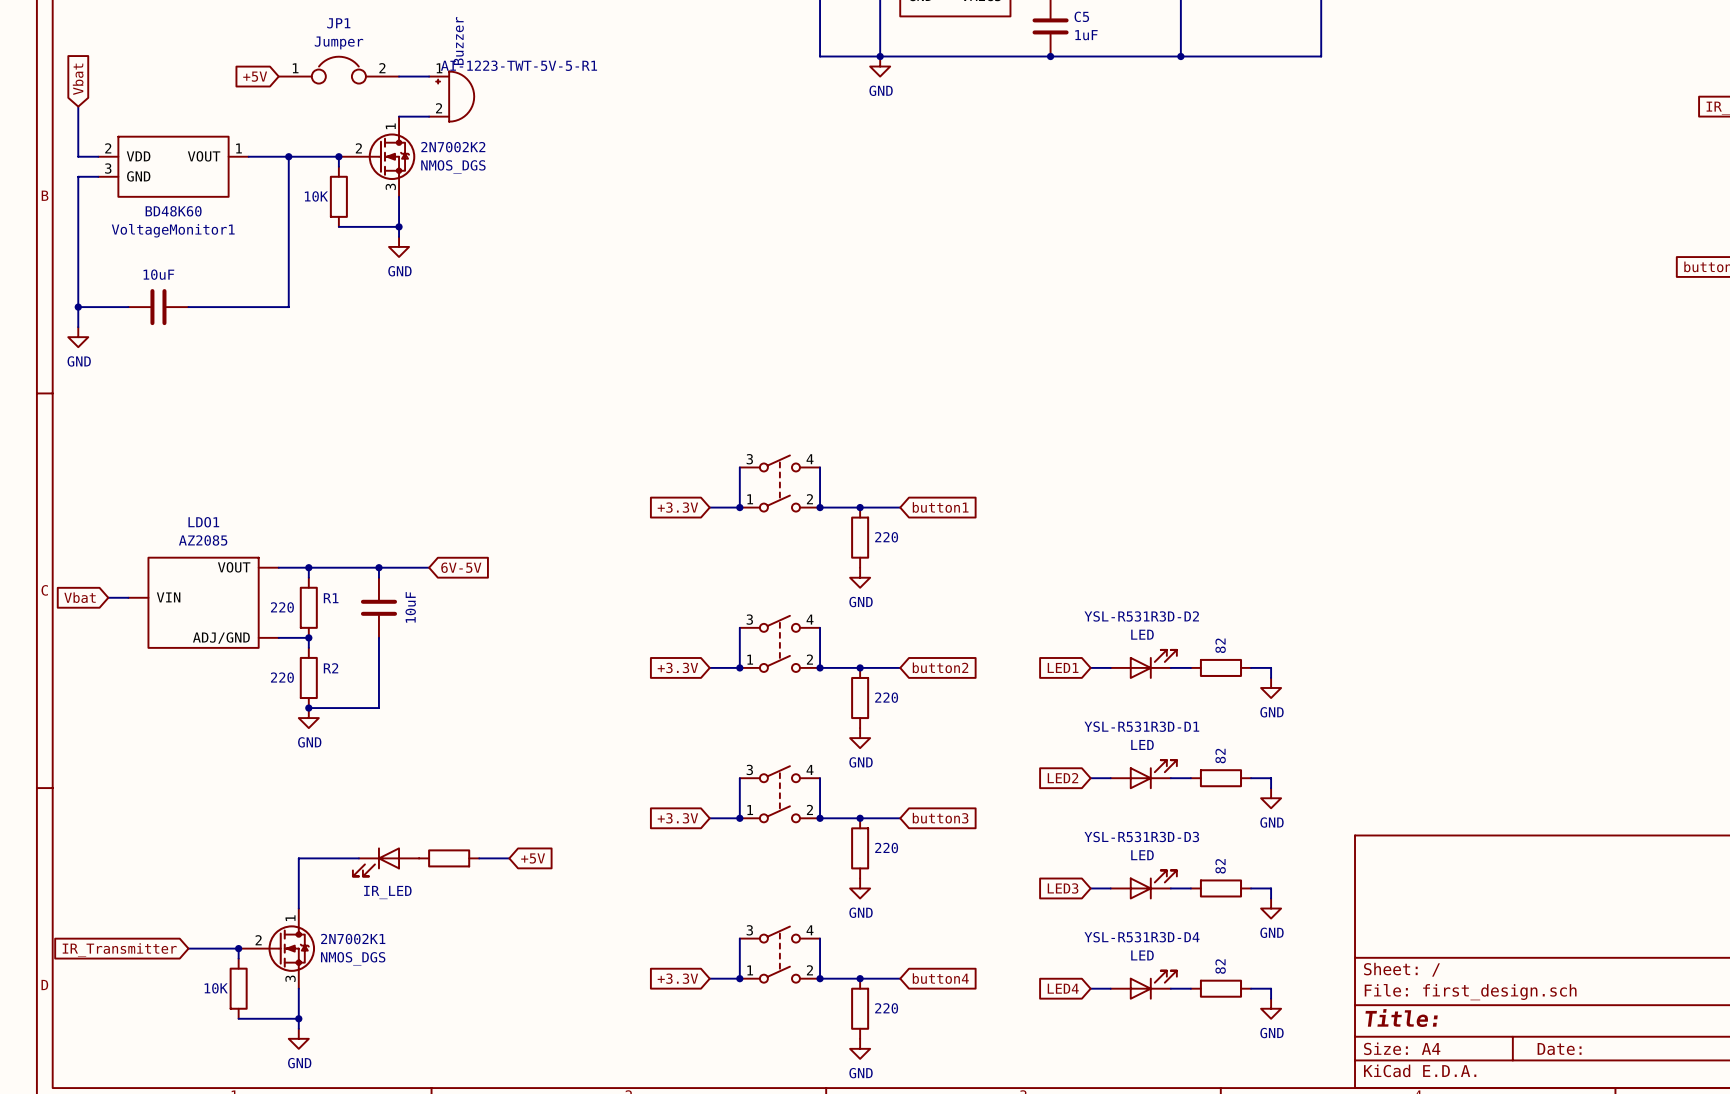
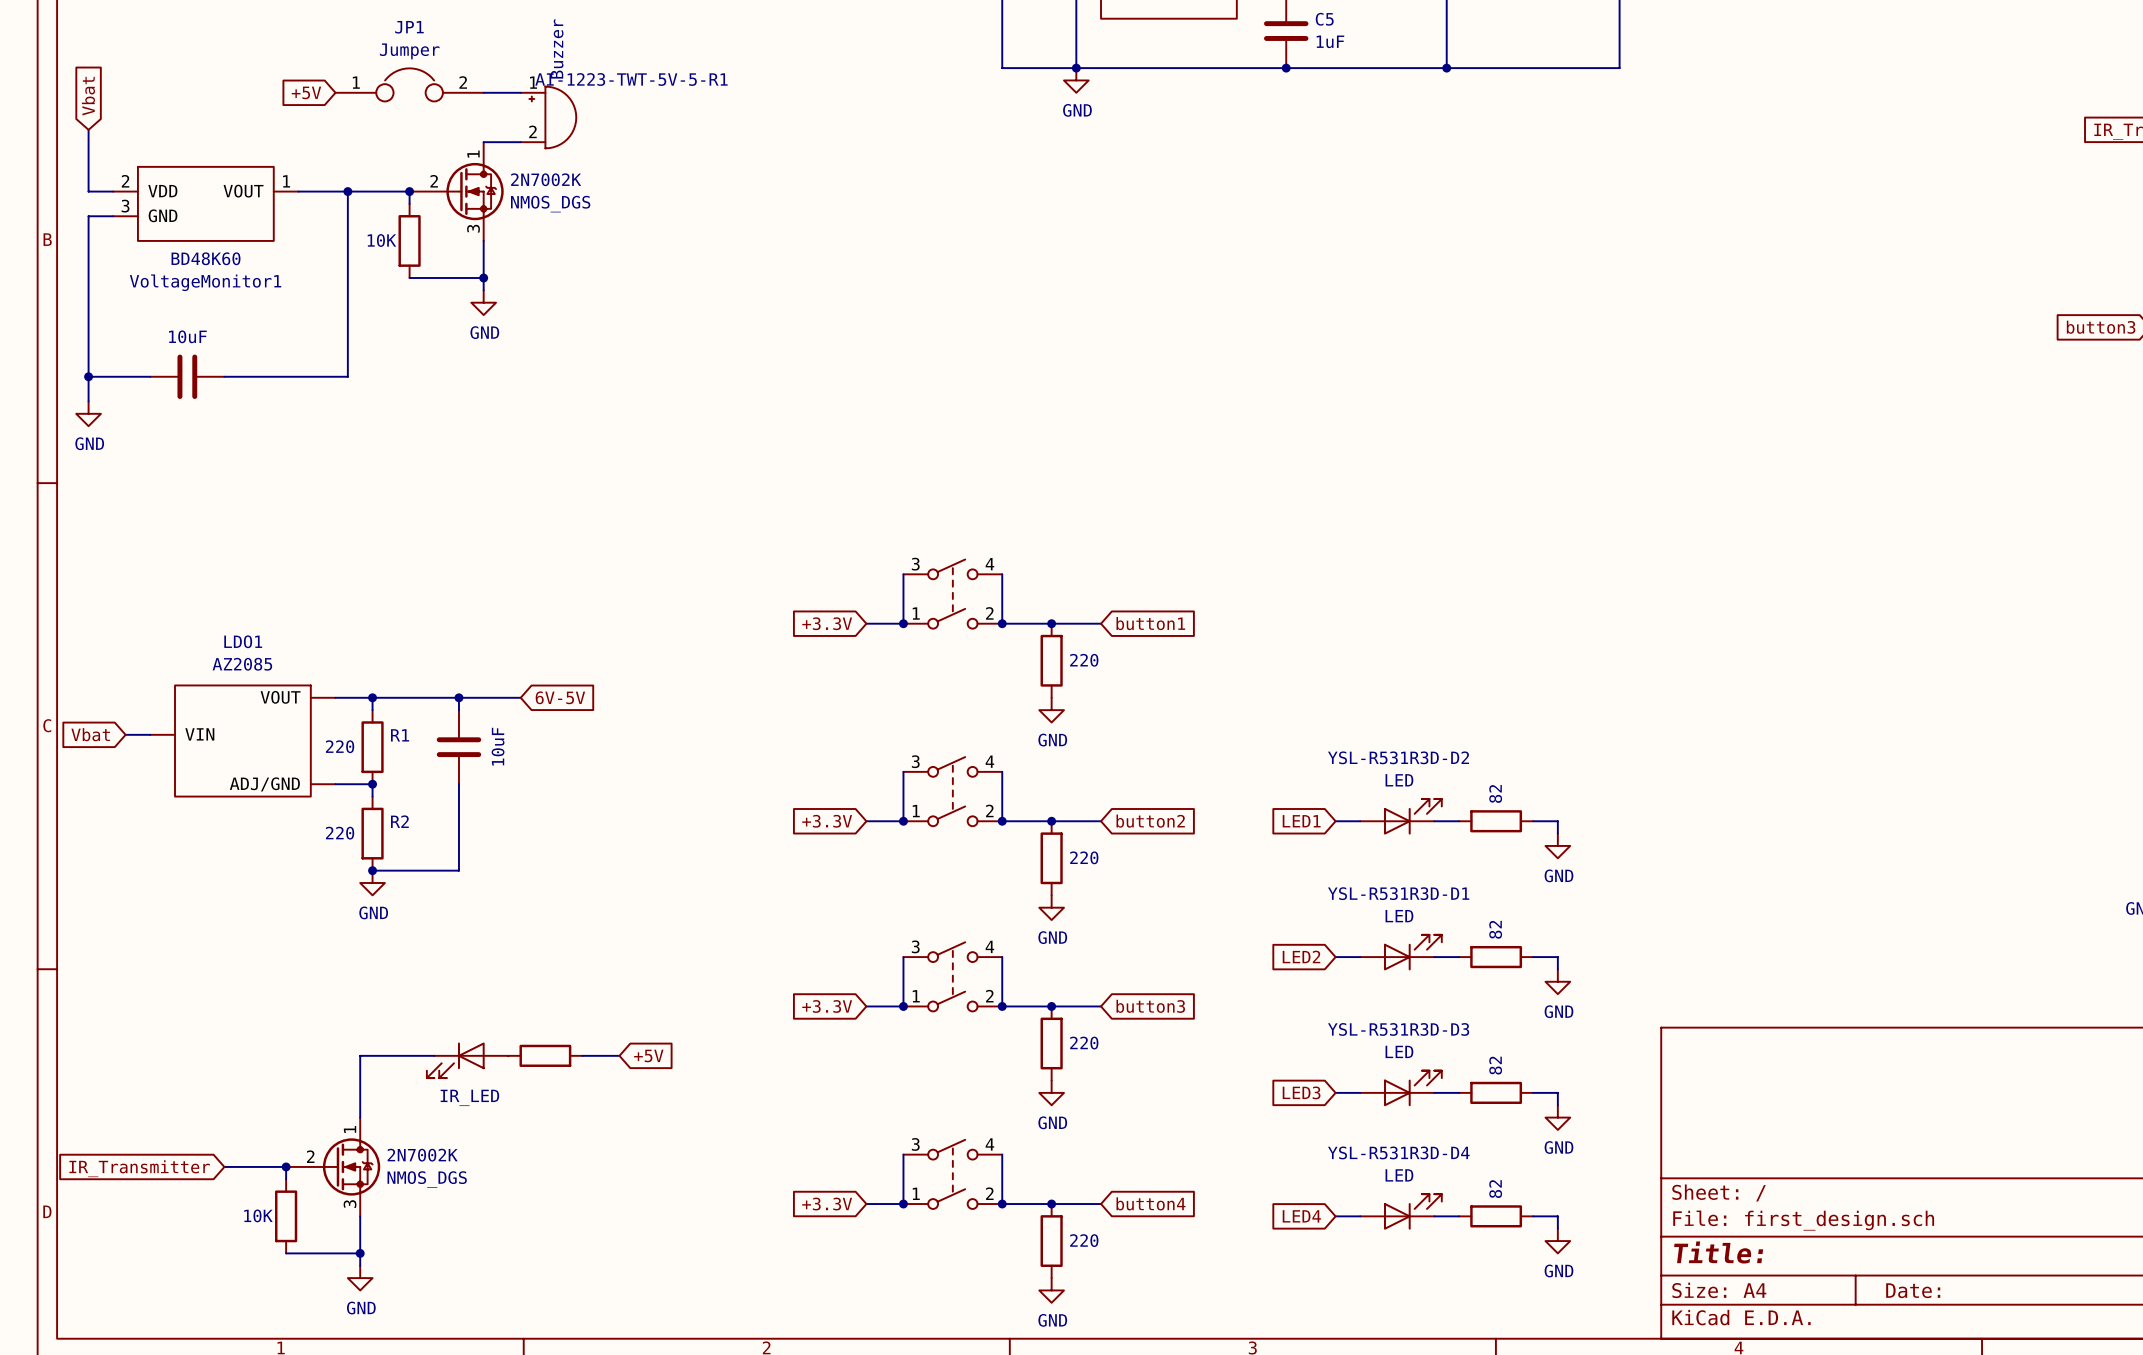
2N7002K2 name: 2N7002K2 (453, 147) -> 2N7002K (546, 179)
2N7002K1 name: 2N7002K1 (353, 939) -> 2N7002K (422, 1155)

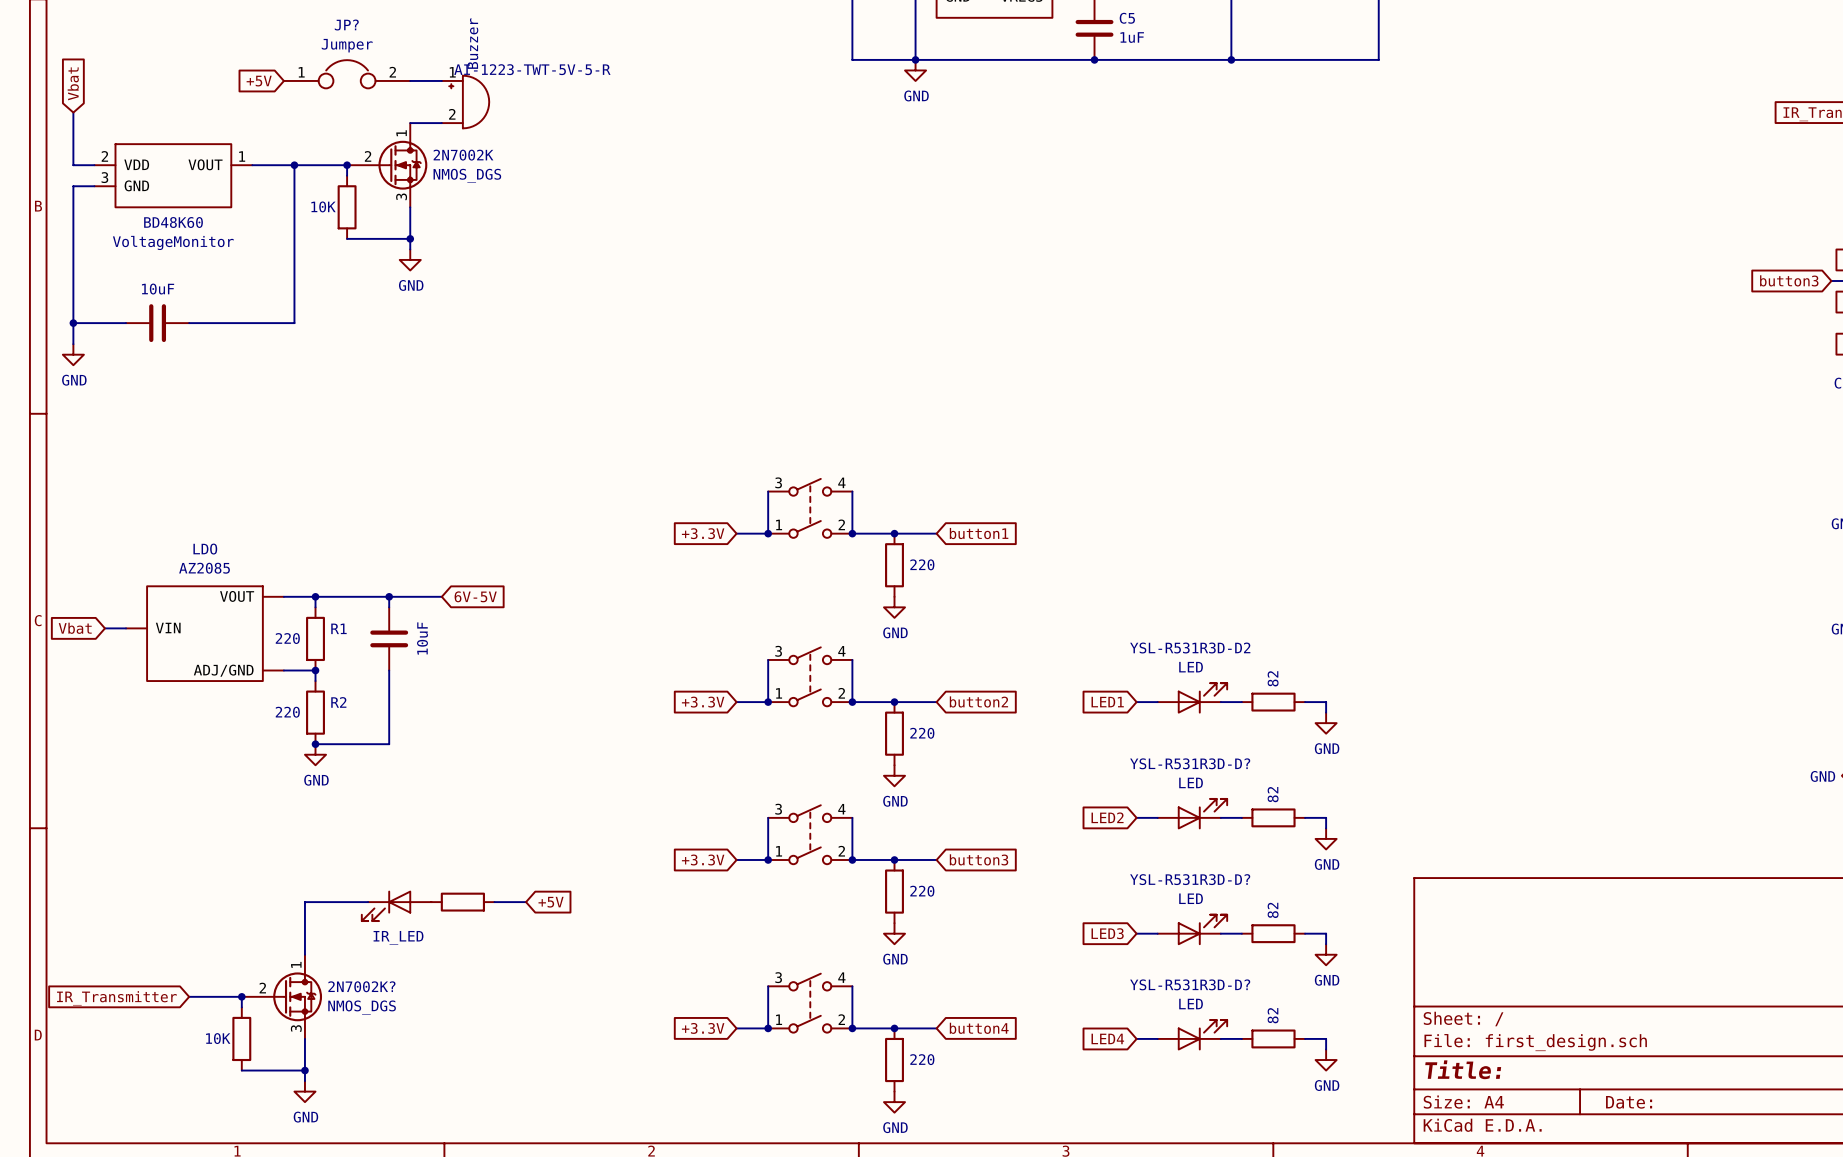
JP1 name: JP1 (409, 27) -> JP? (346, 25)
AI-1223-TWT-5V-5-R1 name: AI-1223-TWT-5V-5-R1 (631, 79) -> AI-1223-TWT-5V-5-R (532, 69)
VoltageMonitor1 name: VoltageMonitor1 (205, 282) -> VoltageMonitor (173, 242)
LDO1 name: LDO1 (243, 641) -> LDO (205, 549)
YSL-R531R3D-D1 name: YSL-R531R3D-D1 (1398, 893) -> YSL-R531R3D-D? (1190, 763)
YSL-R531R3D-D3 name: YSL-R531R3D-D3 (1398, 1029) -> YSL-R531R3D-D? (1190, 879)
YSL-R531R3D-D4 name: YSL-R531R3D-D4 (1398, 1152) -> YSL-R531R3D-D? (1190, 984)
2N7002K name: 2N7002K (422, 1155) -> 2N7002K? (361, 986)

